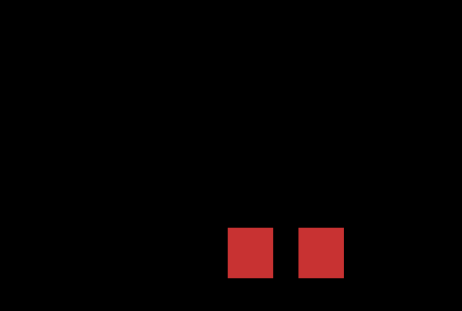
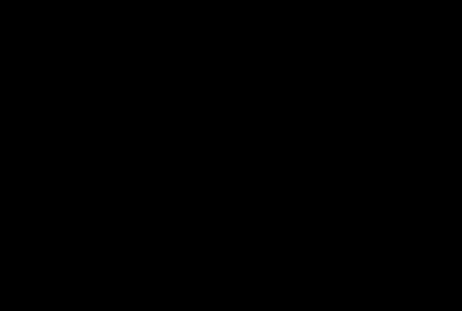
part: (285, 252) -> none

